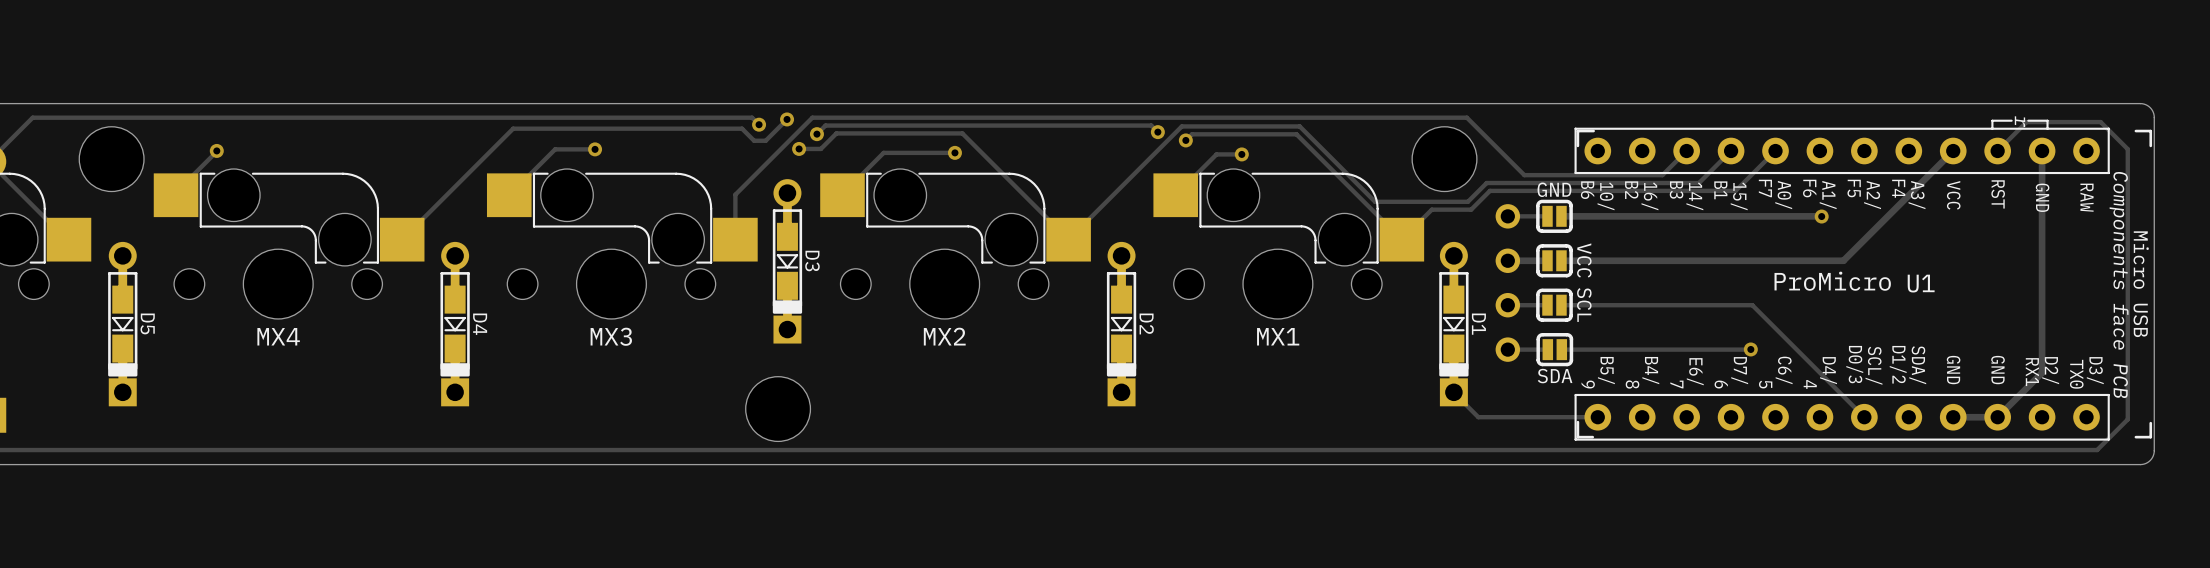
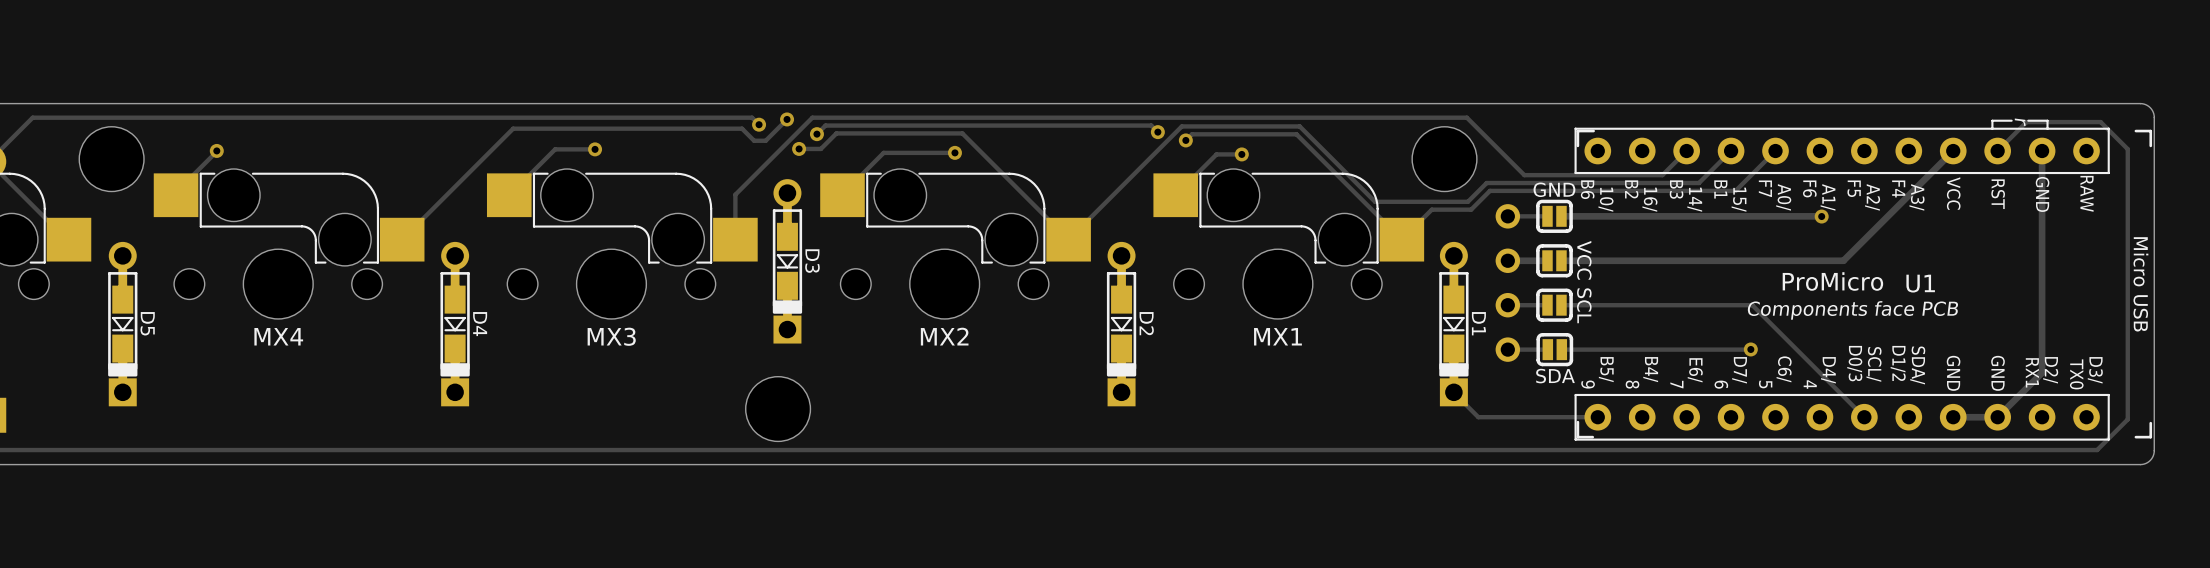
U1 text rotation: 0° (2119, 284) -> 90° counterclockwise (1852, 310)
U1 text position: Components face PCB (2119, 284) -> Components face PCB (1852, 310)

